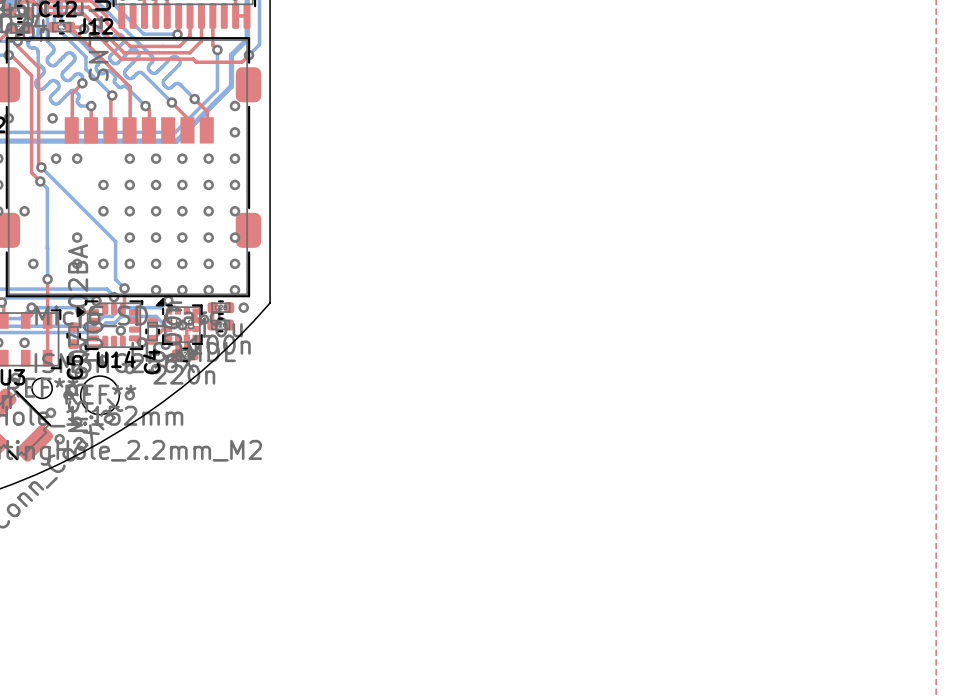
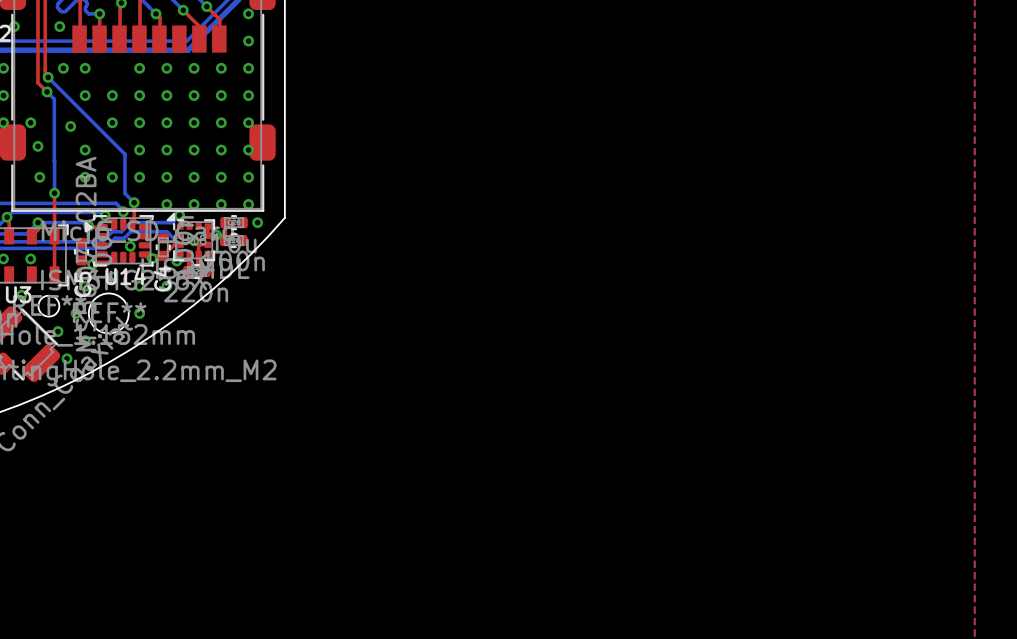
via: none -> (85, 95)
via: none -> (70, 126)
via: none -> (37, 146)

